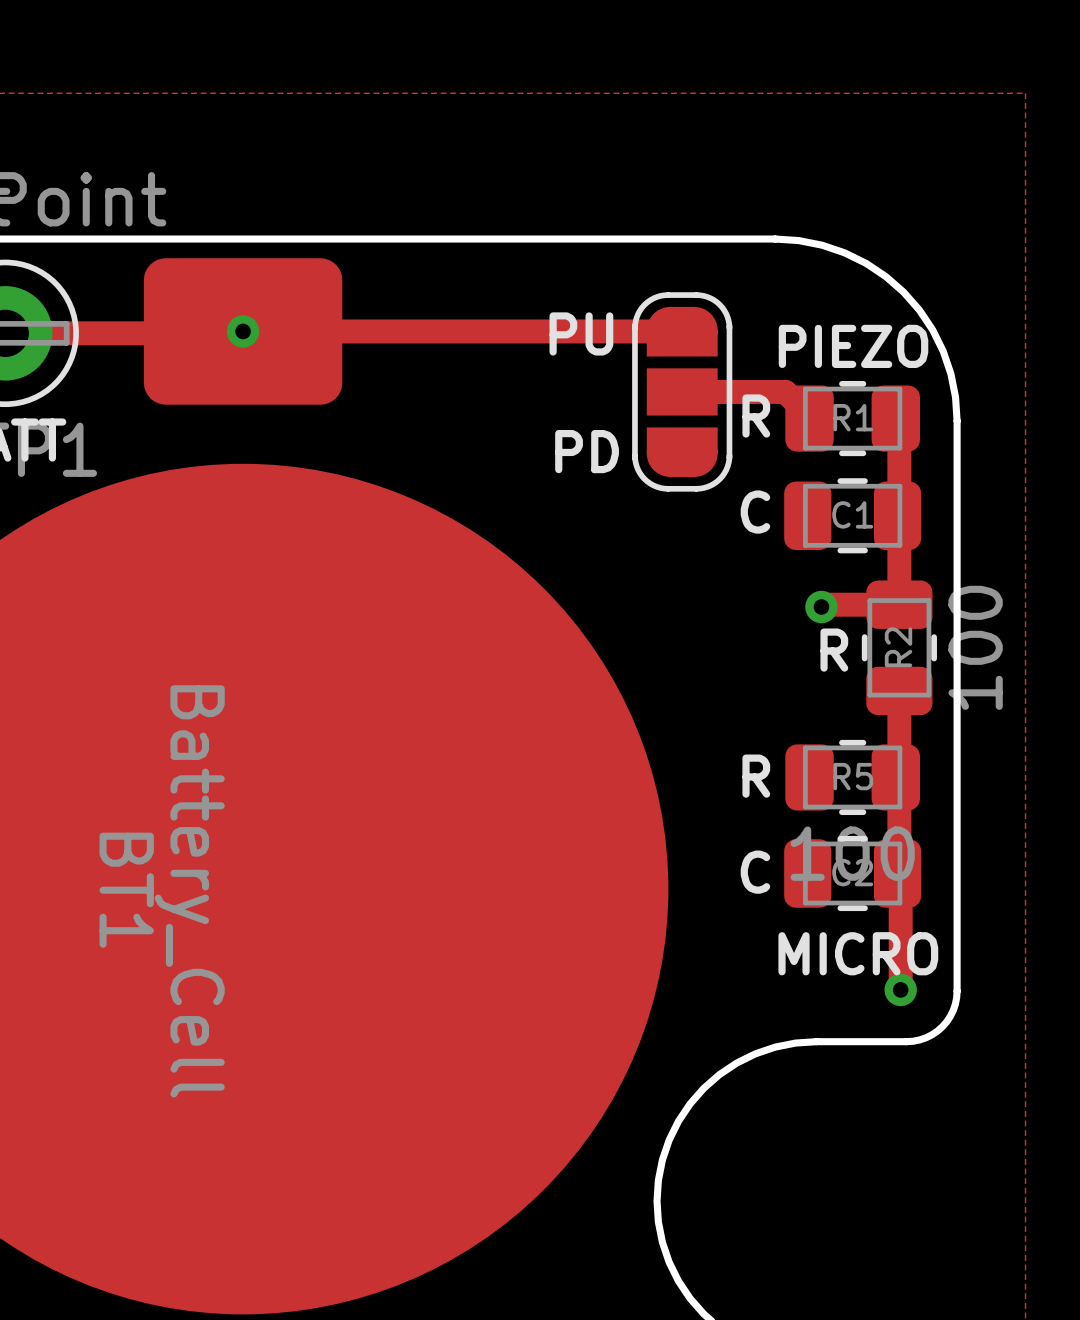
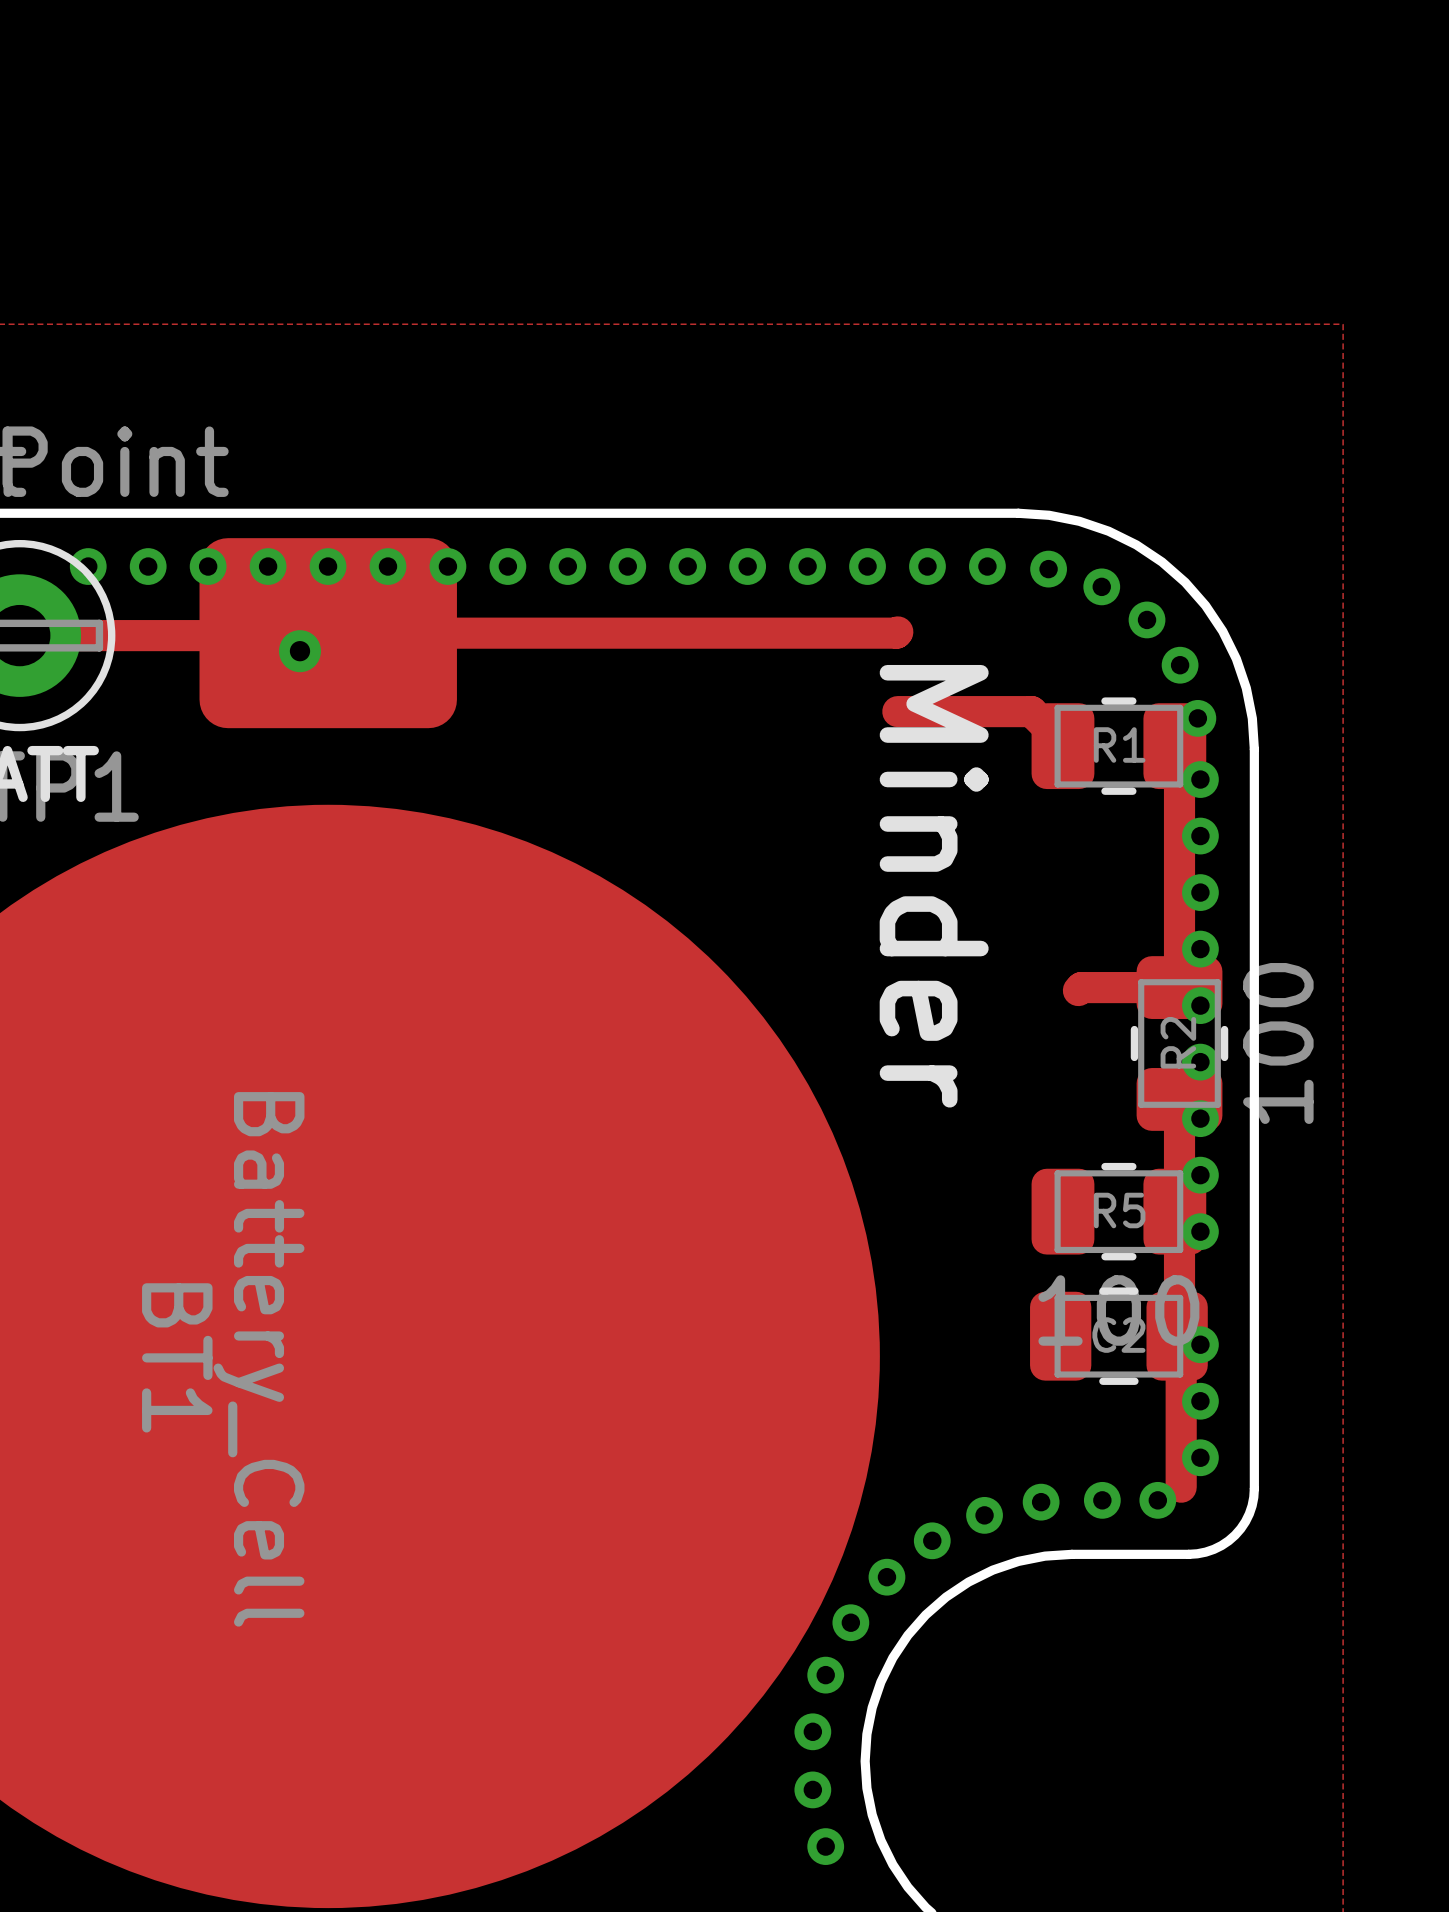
via: none -> (88, 566)
via: none -> (148, 566)
via: none -> (208, 566)
via: none -> (268, 566)
via: none -> (328, 566)
via: none -> (387, 566)
via: none -> (447, 566)
via: none -> (507, 566)
via: none -> (567, 566)
via: none -> (627, 566)
via: none -> (687, 566)
via: none -> (747, 566)
via: none -> (807, 566)
via: none -> (867, 566)
via: none -> (927, 566)
via: none -> (987, 566)
via: none -> (1048, 569)
via: none -> (1101, 586)
via: none -> (1147, 619)
via position: (243, 331) -> (299, 651)
text: PU (581, 333) -> none
text: PIEZO (853, 346) -> none
via: none -> (1180, 665)
part: (682, 391) -> none
via: none -> (1197, 718)
text: R (756, 416) -> none
via: none -> (1200, 779)
text: PD (587, 451) -> none
via: none -> (1200, 836)
text: C (755, 512) -> none
C1: (852, 515) -> none
text: none -> Minder (934, 886)
via: none -> (1200, 892)
via: none -> (1200, 949)
via: (821, 607) -> none
via: none -> (1200, 1005)
text: R (834, 650) -> none
via: none -> (1200, 1062)
via: none -> (1200, 1118)
via: none -> (1200, 1175)
text: R (756, 776) -> none
via: none -> (1200, 1231)
text: C (755, 872) -> none
via: none -> (1200, 1344)
via: none -> (1200, 1401)
text: MICRO (858, 953) -> none
via: none -> (1200, 1457)
via: (900, 989) -> none
via: none -> (1102, 1500)
via: none -> (1157, 1500)
via: none -> (1041, 1502)
via: none -> (984, 1515)
via: none -> (932, 1540)
via: none -> (886, 1577)
via: none -> (850, 1622)
via: none -> (825, 1675)
via: none -> (812, 1731)
via: none -> (812, 1789)
via: none -> (825, 1846)

